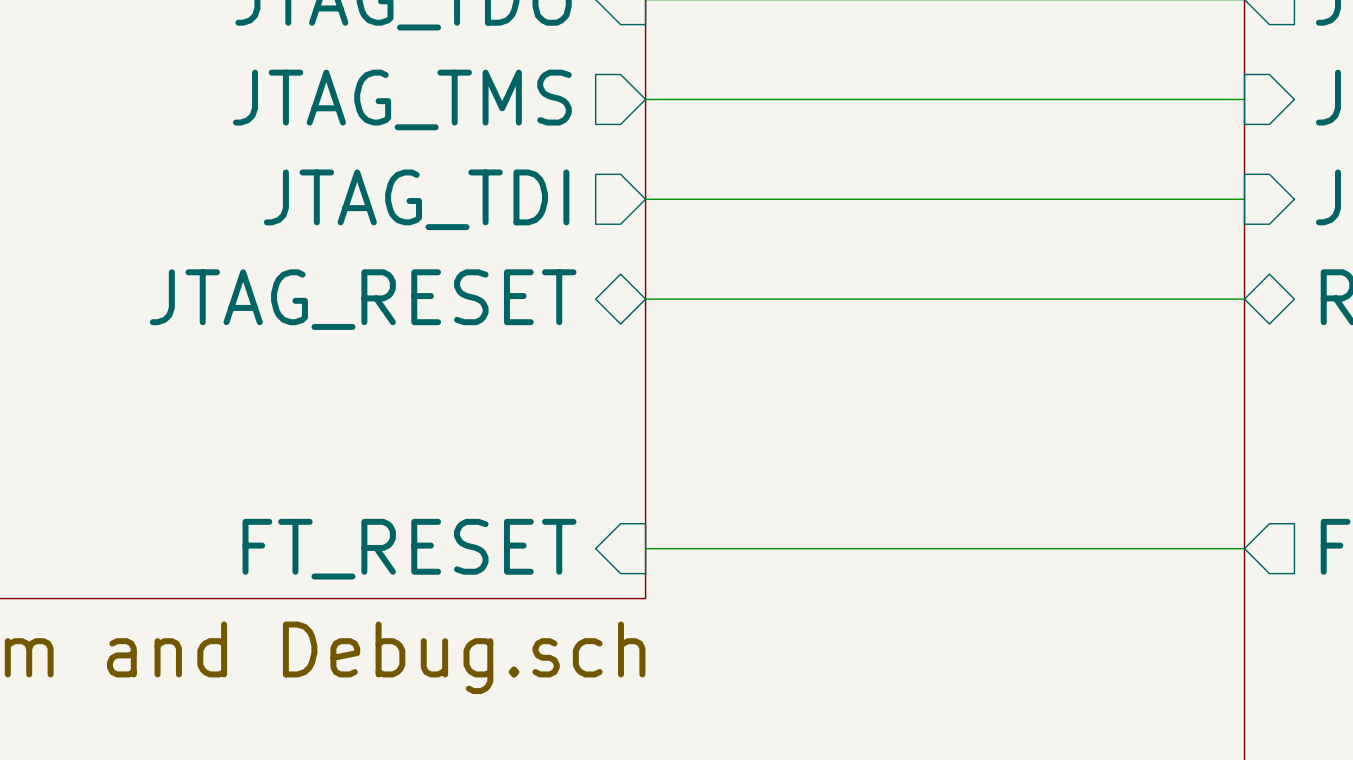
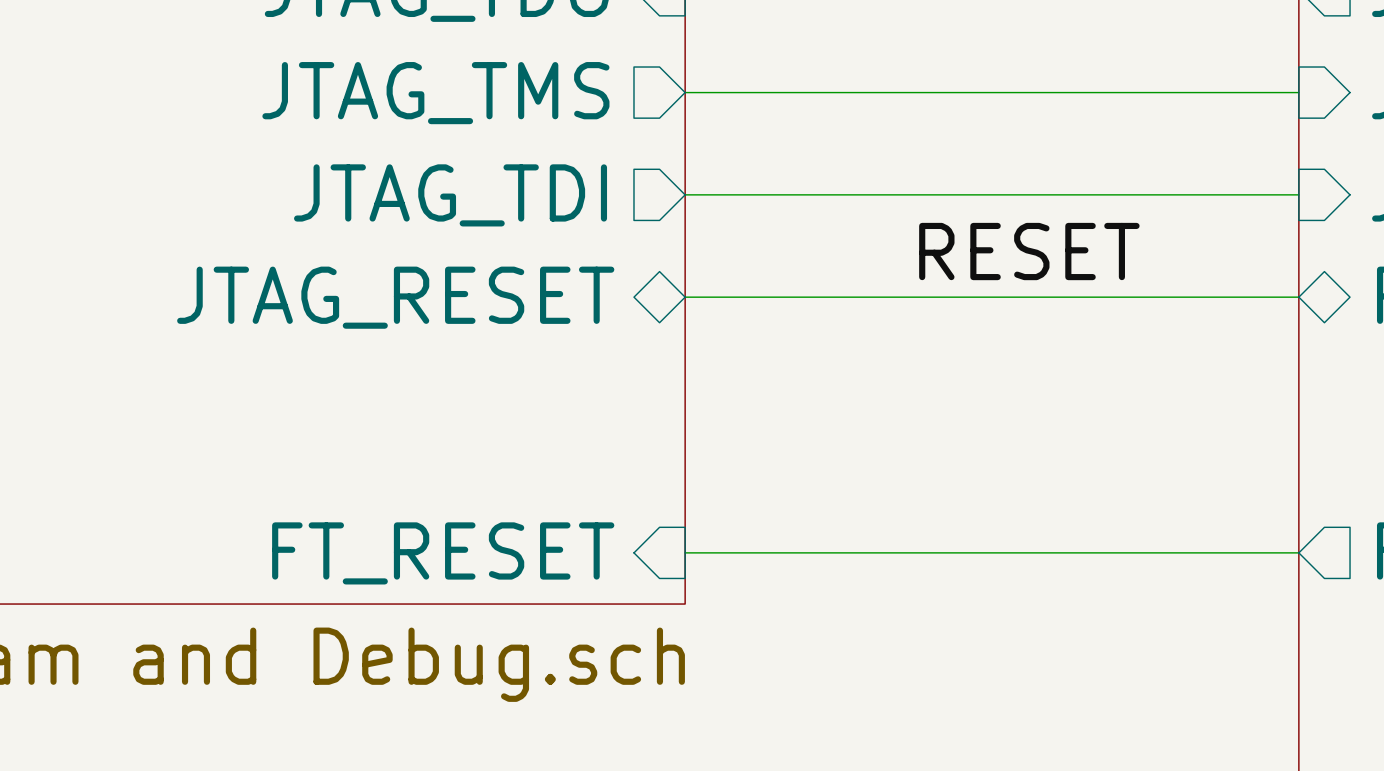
label: none -> RESET (1029, 251)

